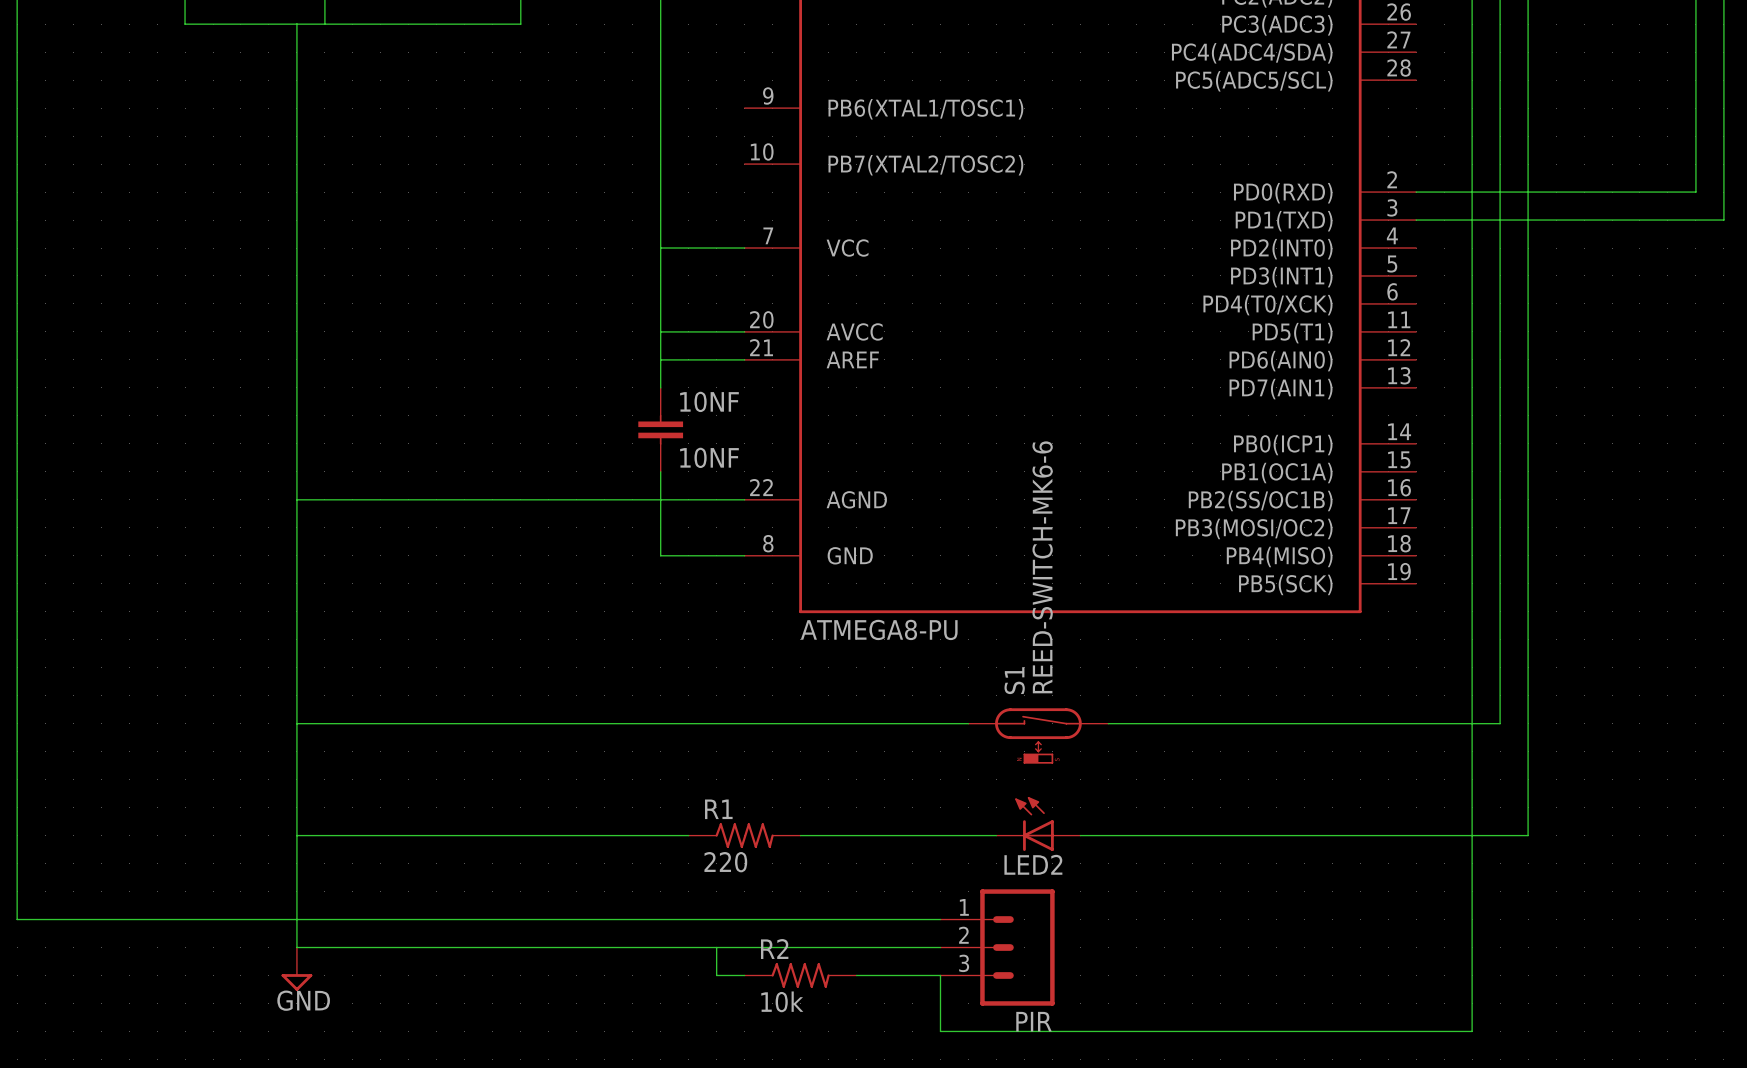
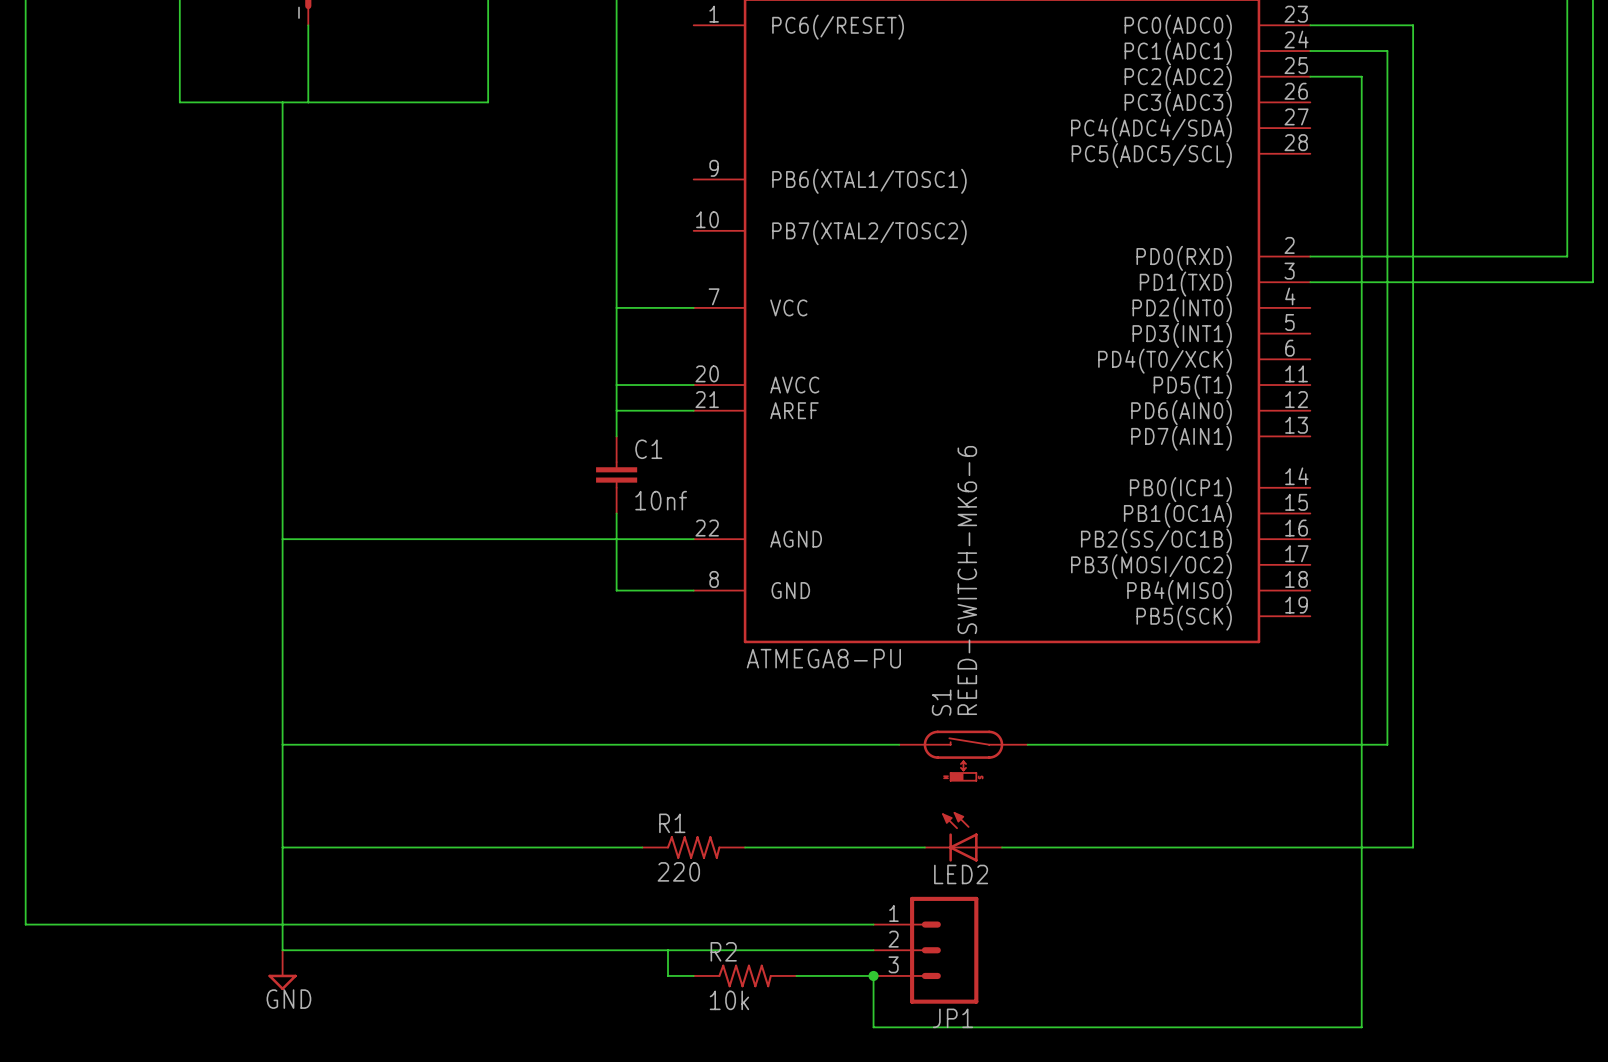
10NF name: 10NF (709, 401) -> C1 (648, 449)
10NF value: 10NF (709, 457) -> 10nf (661, 500)
junction: none -> (873, 975)
PIR name: PIR (1033, 1021) -> JP1 (953, 1018)

